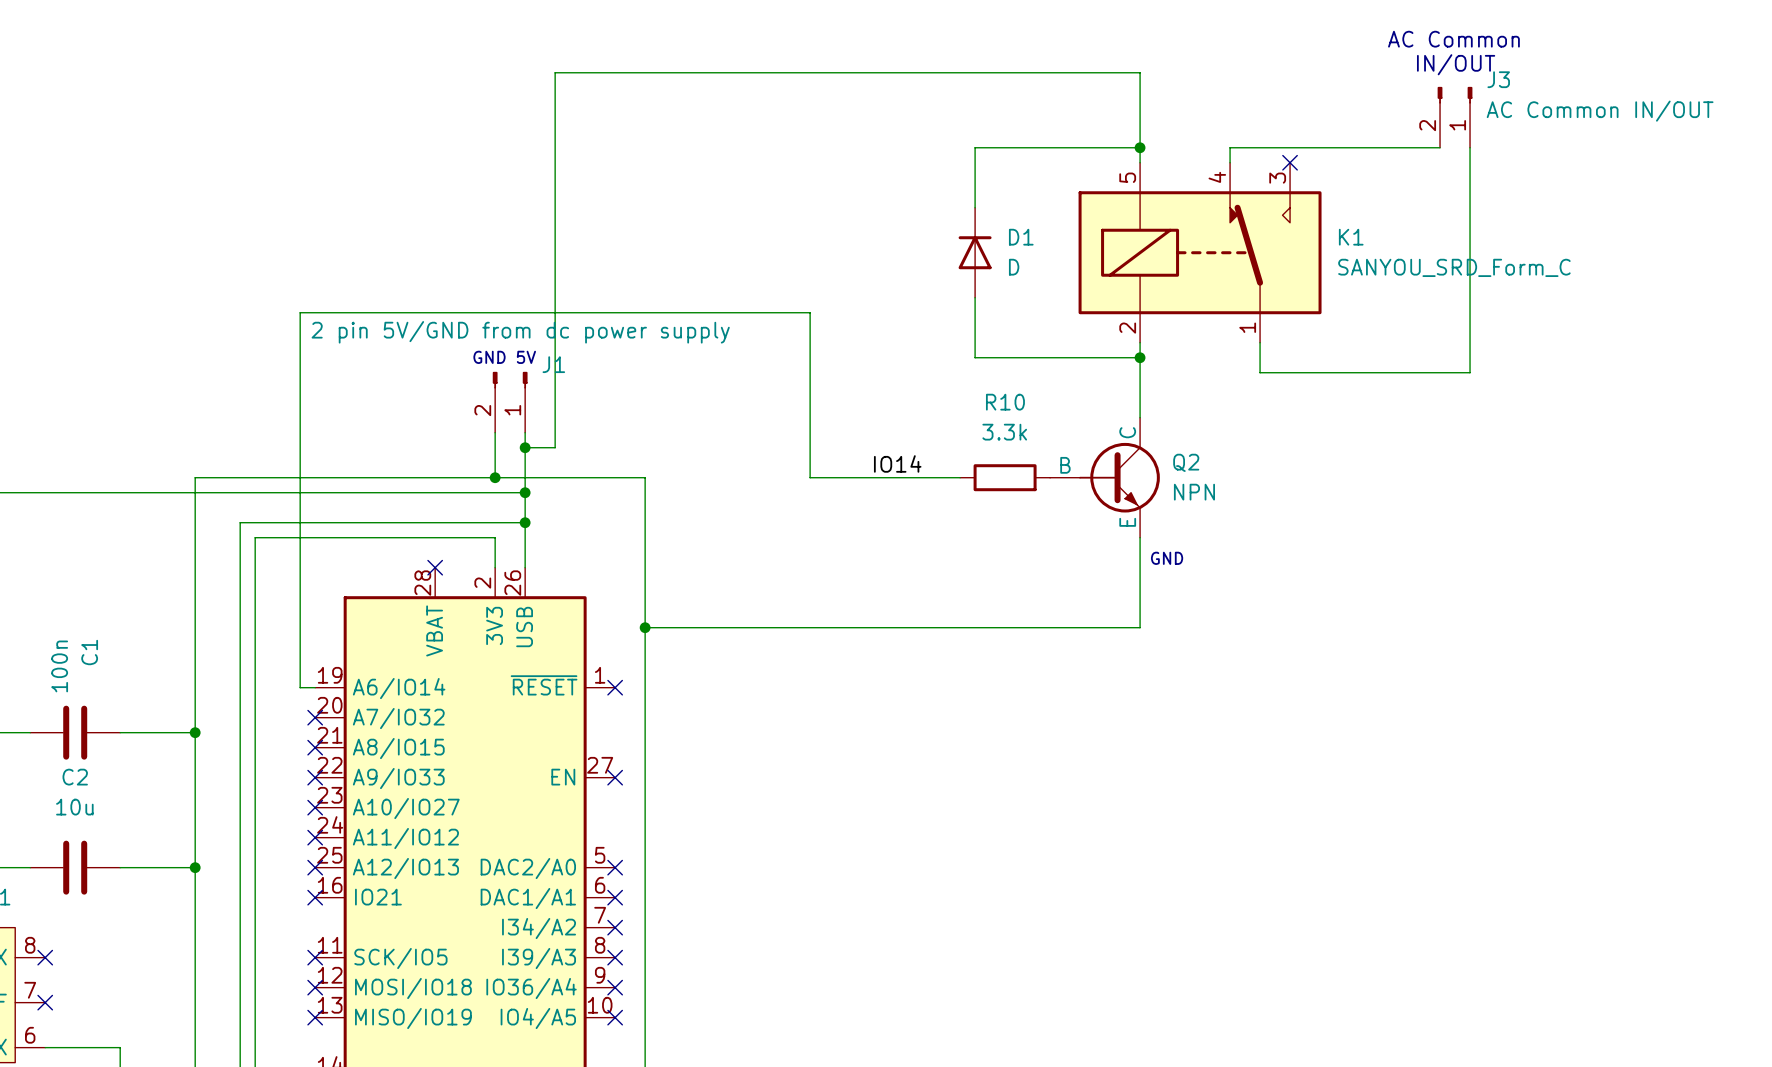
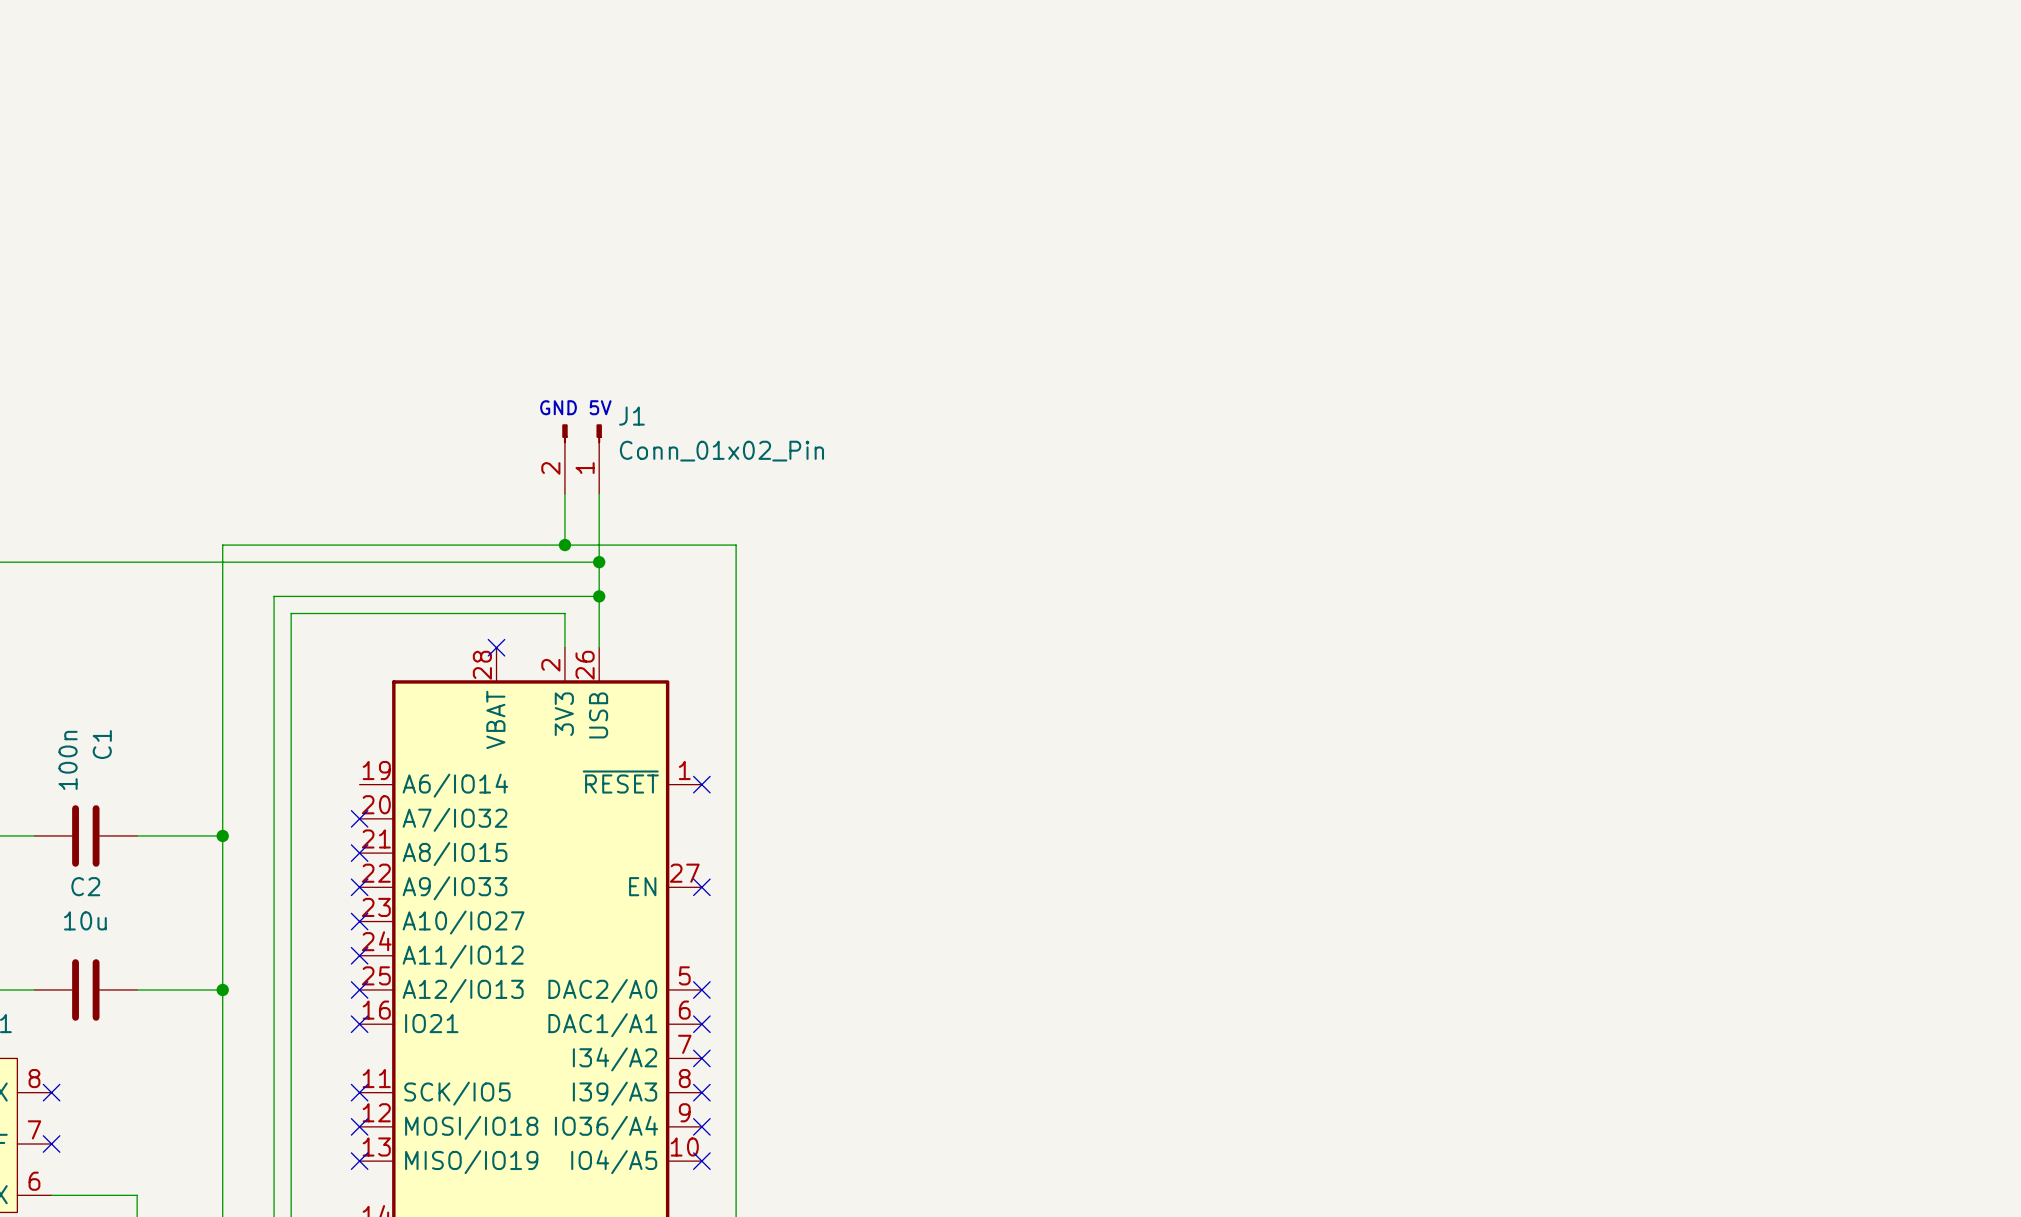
text: AC Common (1453, 39) -> none
text: IN/OUT (1456, 64) -> none
J3: AC Common IN/OUT (1455, 117) -> none
wire: (1140, 147) (975, 147) (975, 207) -> none
junction: (1140, 147) -> none
wire: (1440, 147) (1230, 147) (1230, 162) -> none
wire: (1470, 147) (1470, 372) (1260, 372) (1260, 342) -> none
wire: (1140, 162) (1140, 72) (555, 72) (555, 447) (525, 447) -> none
no-connect mark: (1290, 162) -> none
D1: D (975, 252) -> none
K1: SANYOU_SRD_Form_C (1200, 252) -> none
wire: (975, 297) (975, 357) (1140, 357) -> none
J1 value: 2 pin 5V/GND from dc power supply (520, 332) -> Conn_01x02_Pin (721, 451)
wire: (1140, 342) (1140, 417) -> none
junction: (1140, 357) -> none
junction: (525, 447) -> none
label: IO14 (897, 463) -> none
wire: (960, 477) (810, 477) (810, 312) (300, 312) (300, 687) (315, 687) -> none
R10: 3.3k (1005, 477) -> none
Q2: NPN (1104, 477) -> none
wire: (1140, 537) (1140, 627) (645, 627) -> none
text: GND (1167, 558) -> none
junction: (645, 627) -> none

